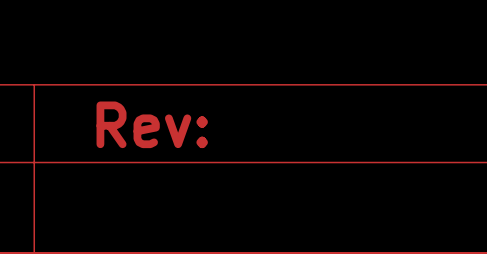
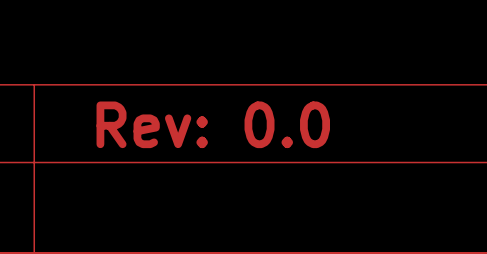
title block: Rev: (152, 124) -> Rev: 0.0 (213, 124)

